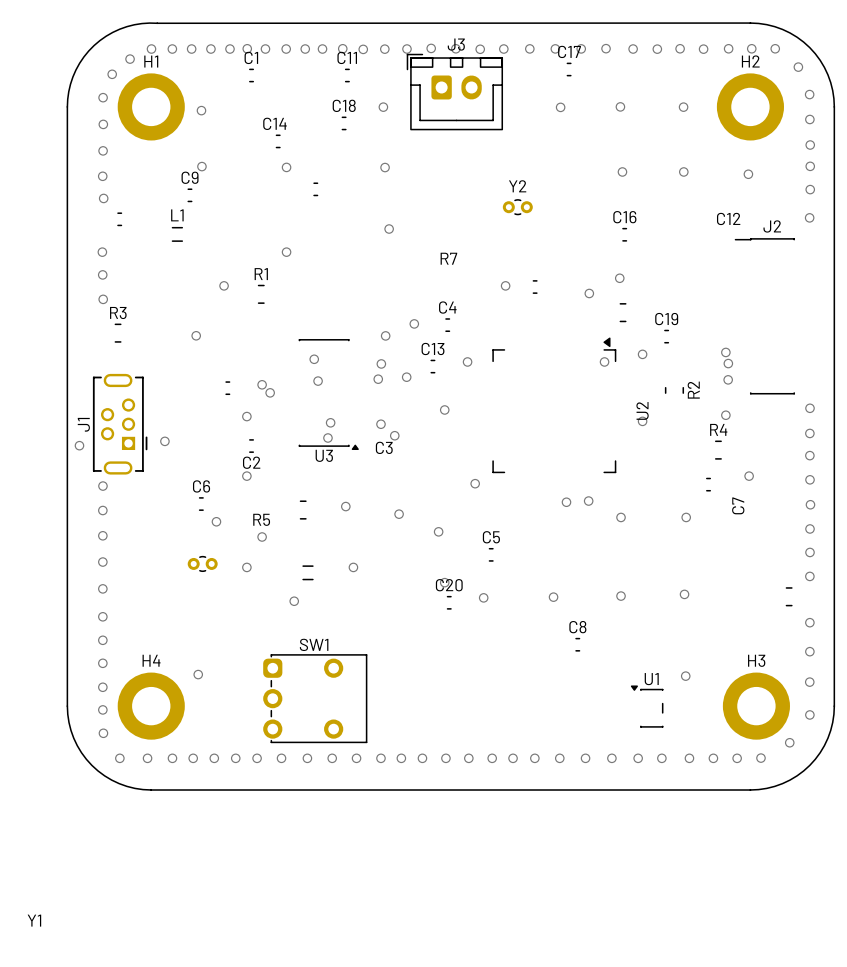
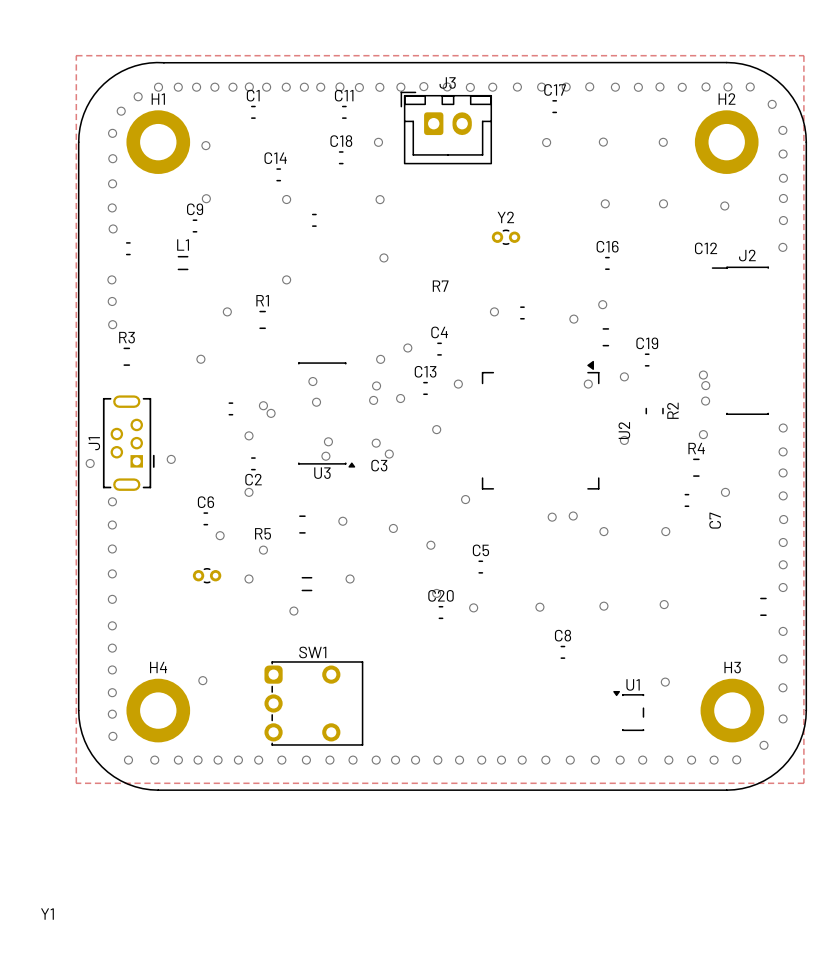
zone outline: none -> (76, 55) (803, 55) (803, 783) (76, 783) (76, 55)

